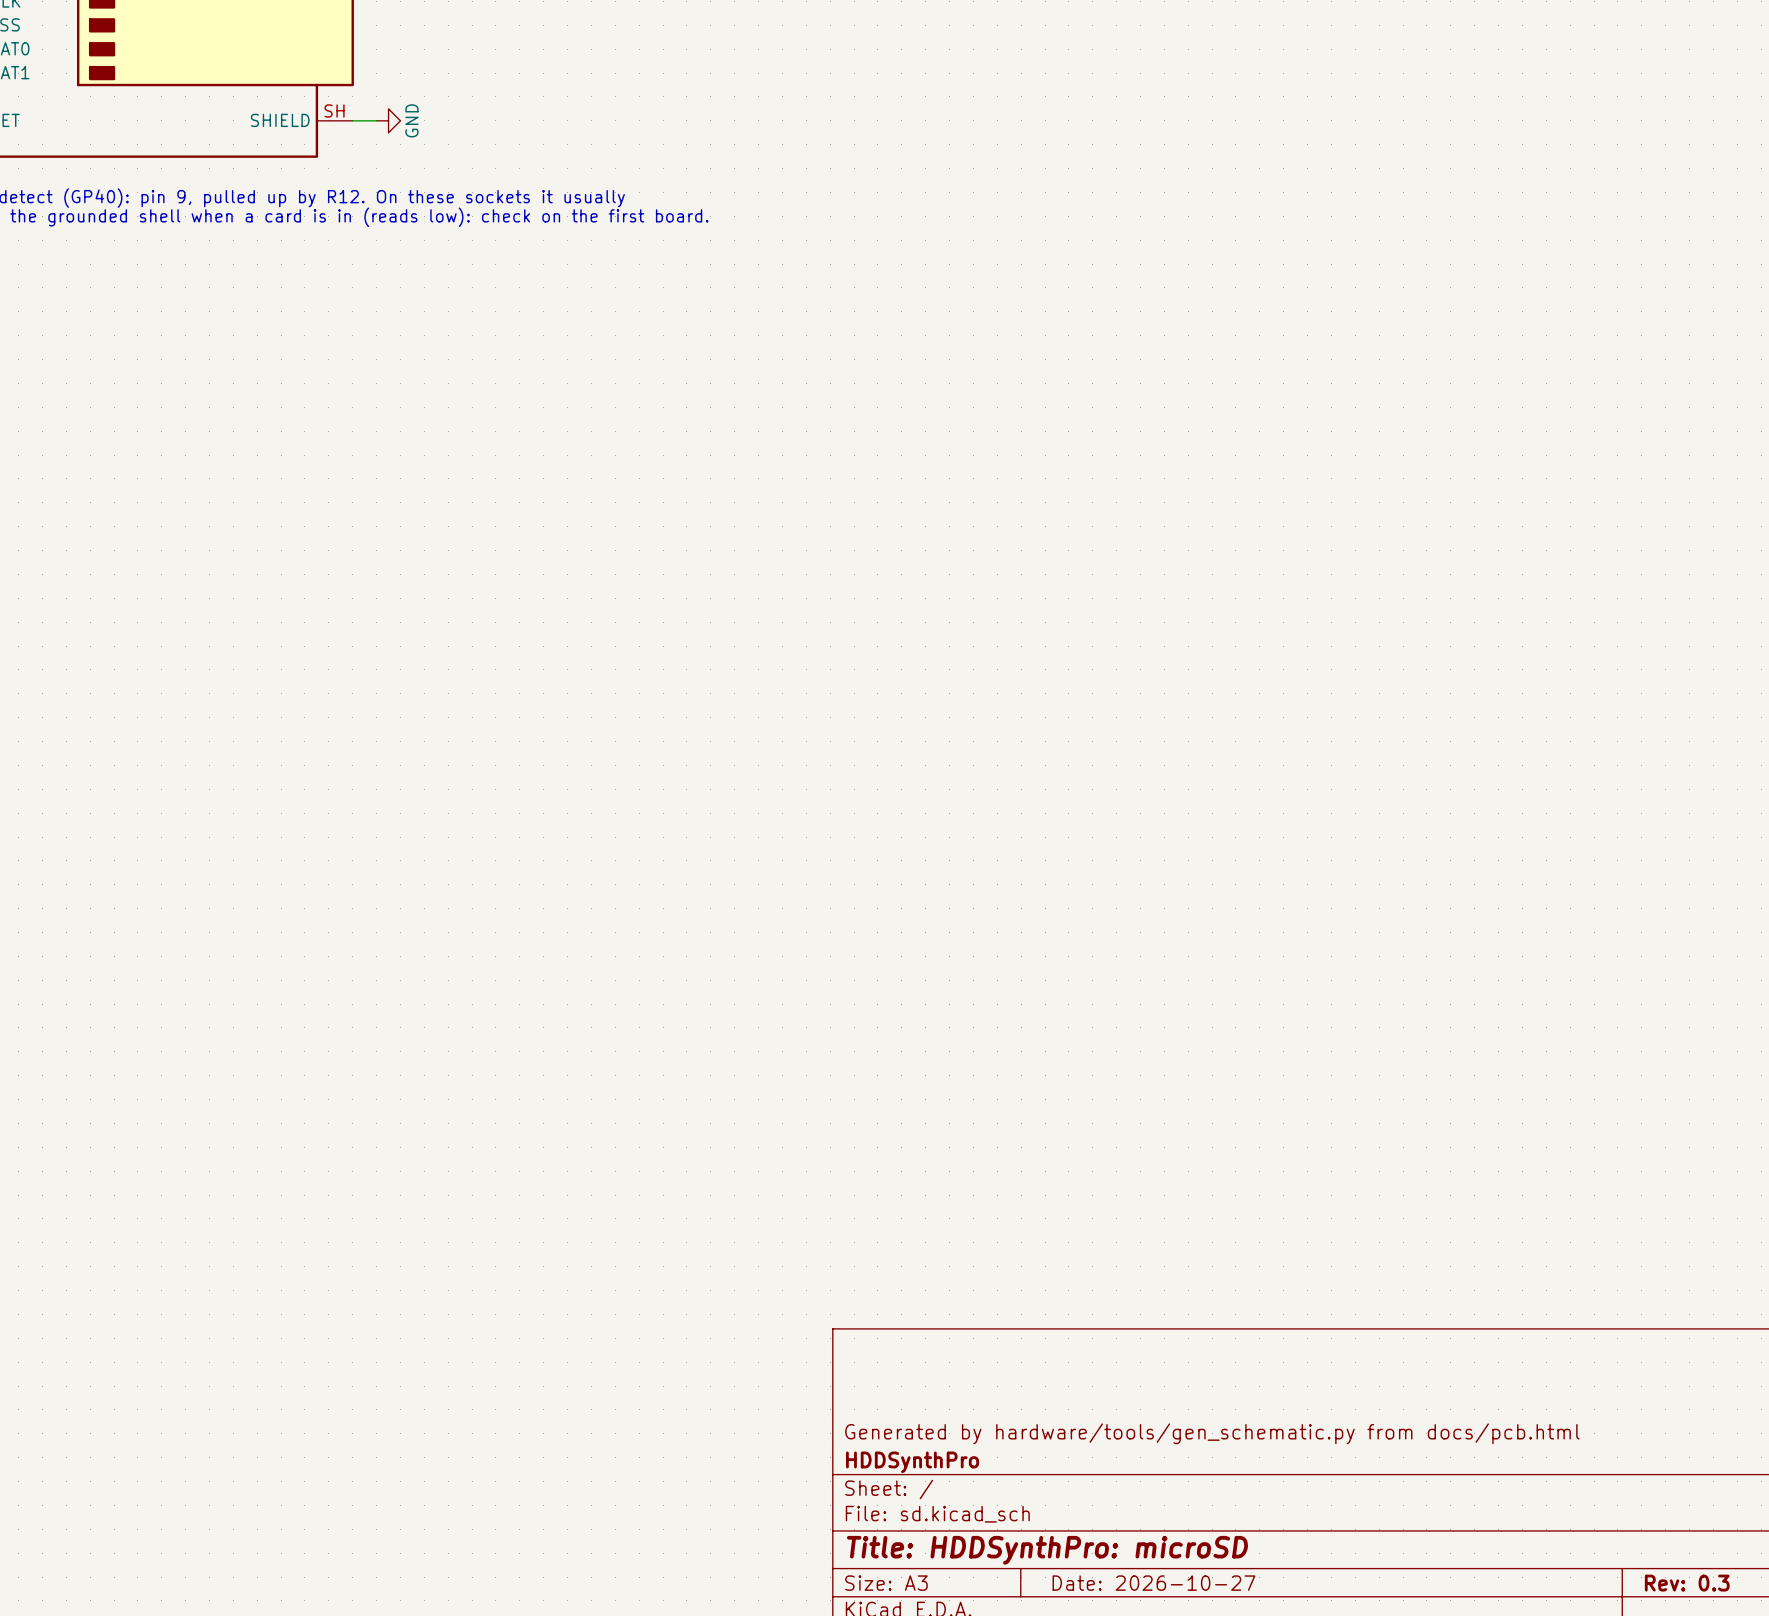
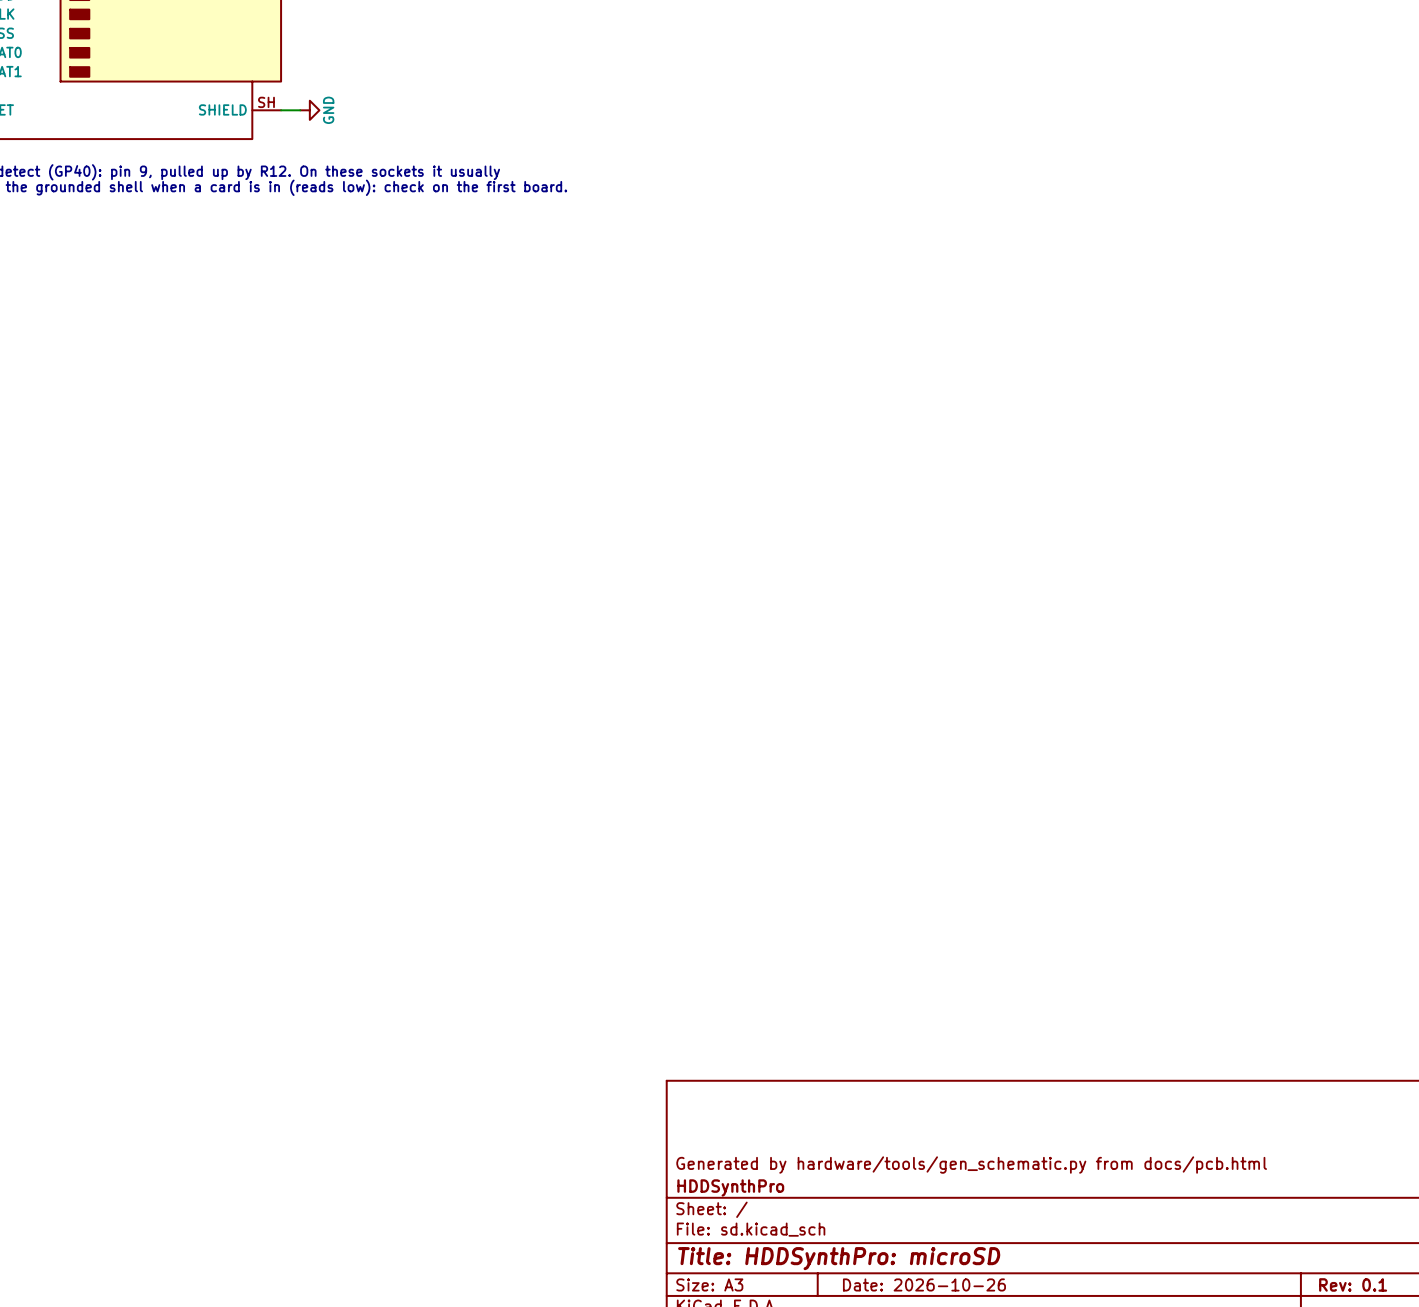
title block: Date: 2026-10-27 (1153, 1583) -> Date: 2026-10-26 (924, 1284)
title block: Rev: 0.3 (1687, 1583) -> Rev: 0.1 (1353, 1284)

